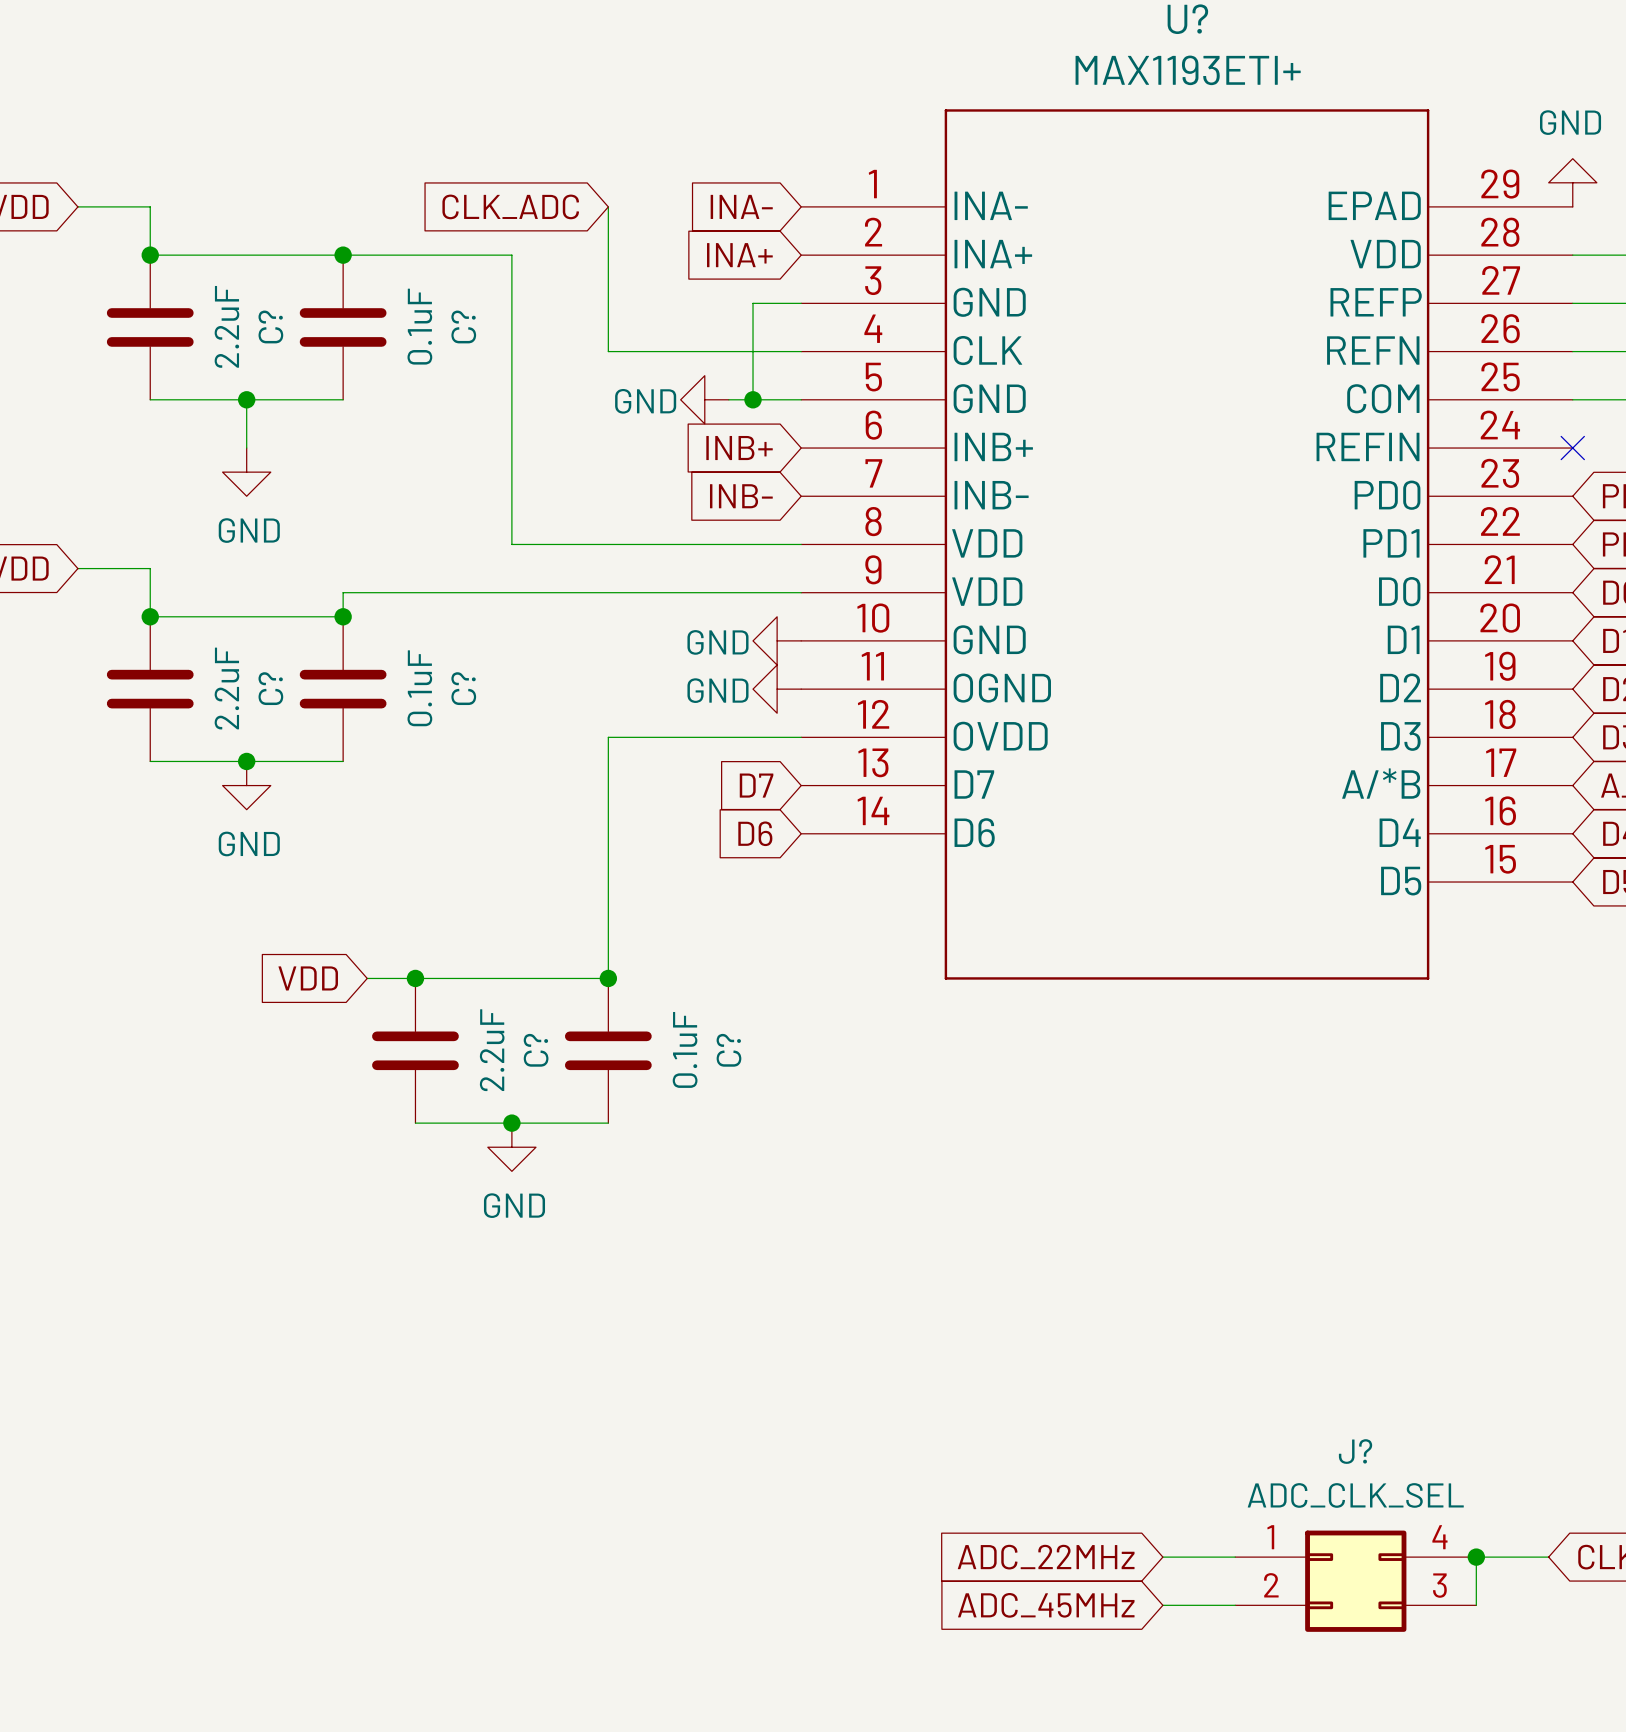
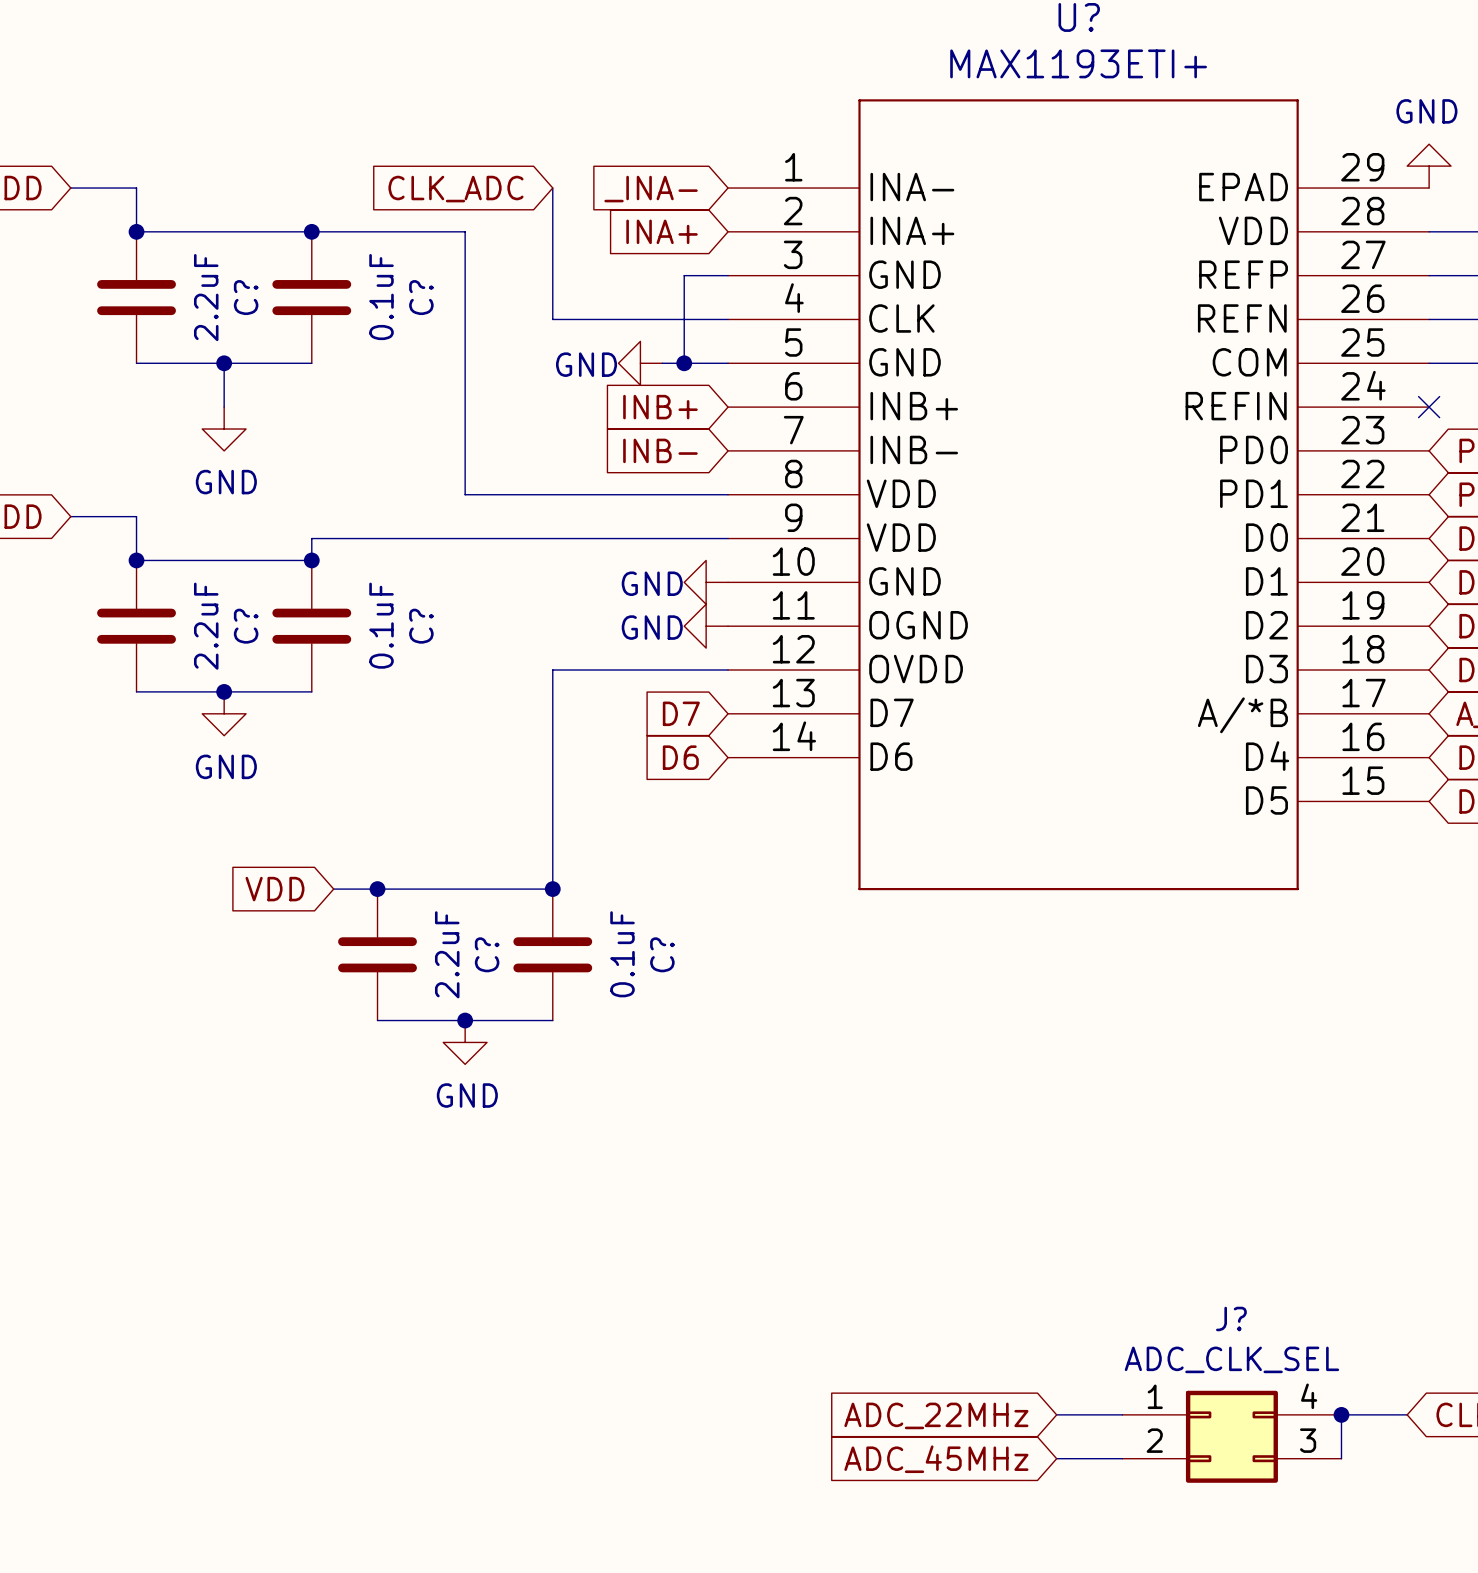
global label: INA- (741, 206) -> _INA- (651, 189)

